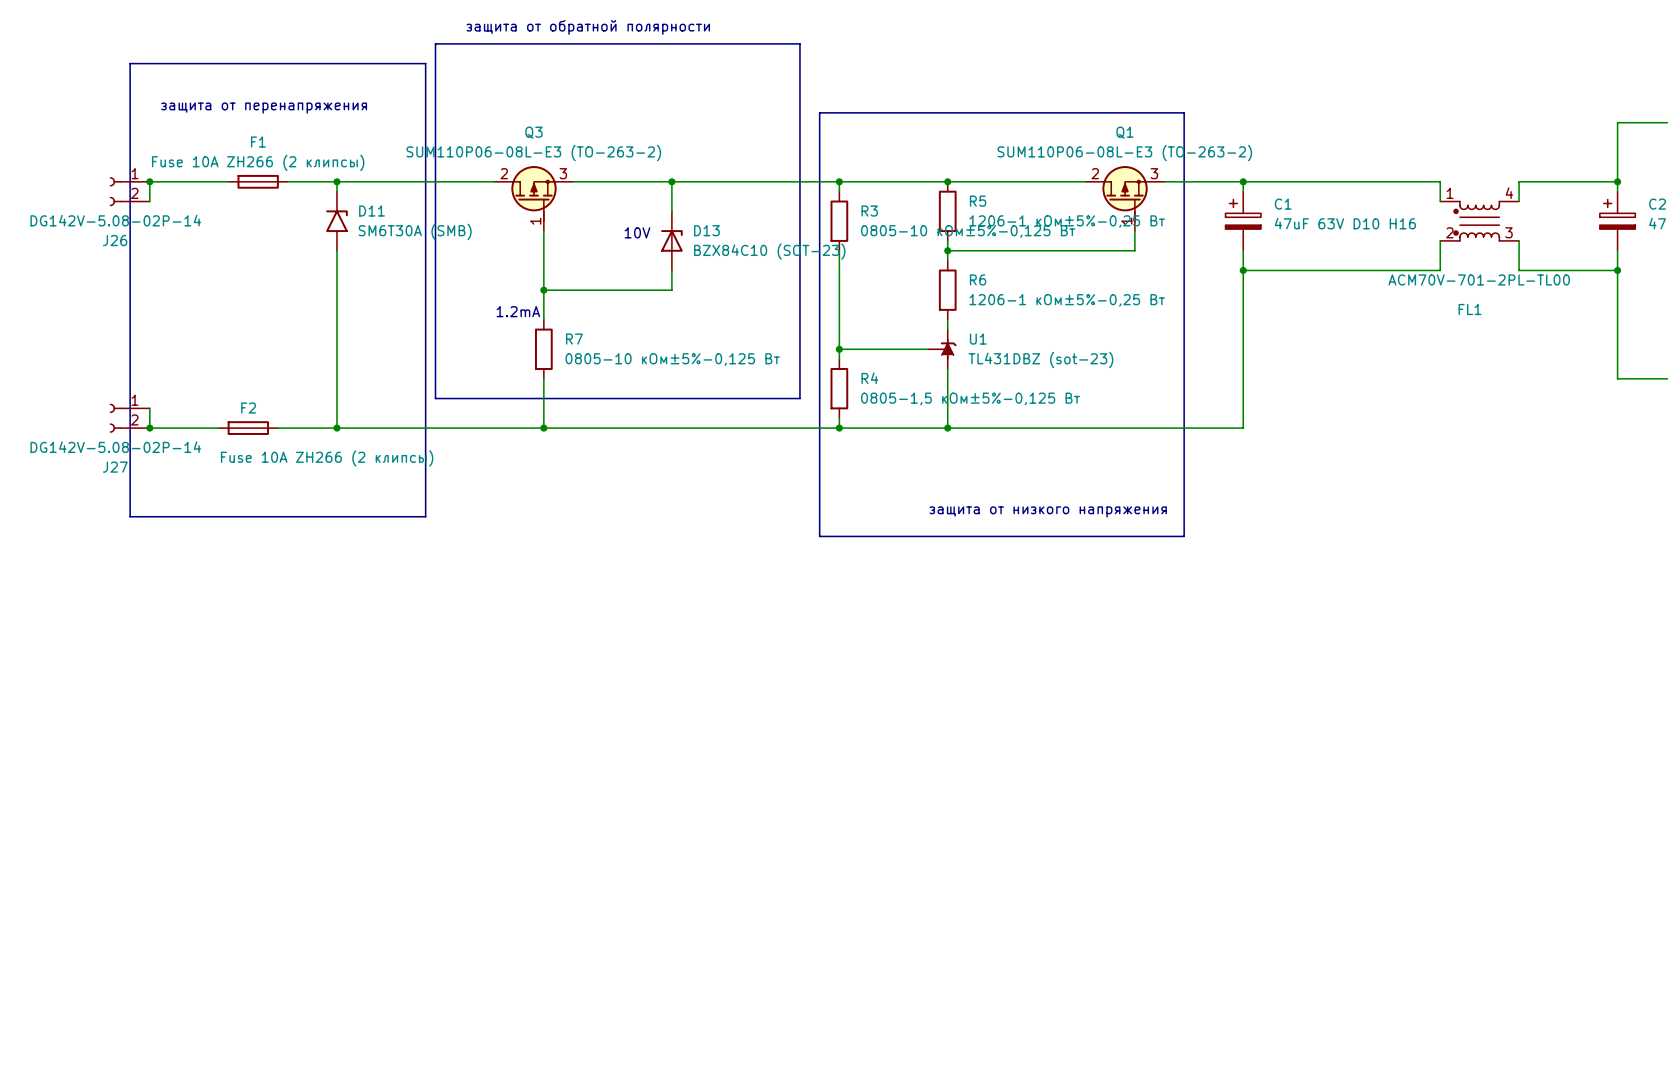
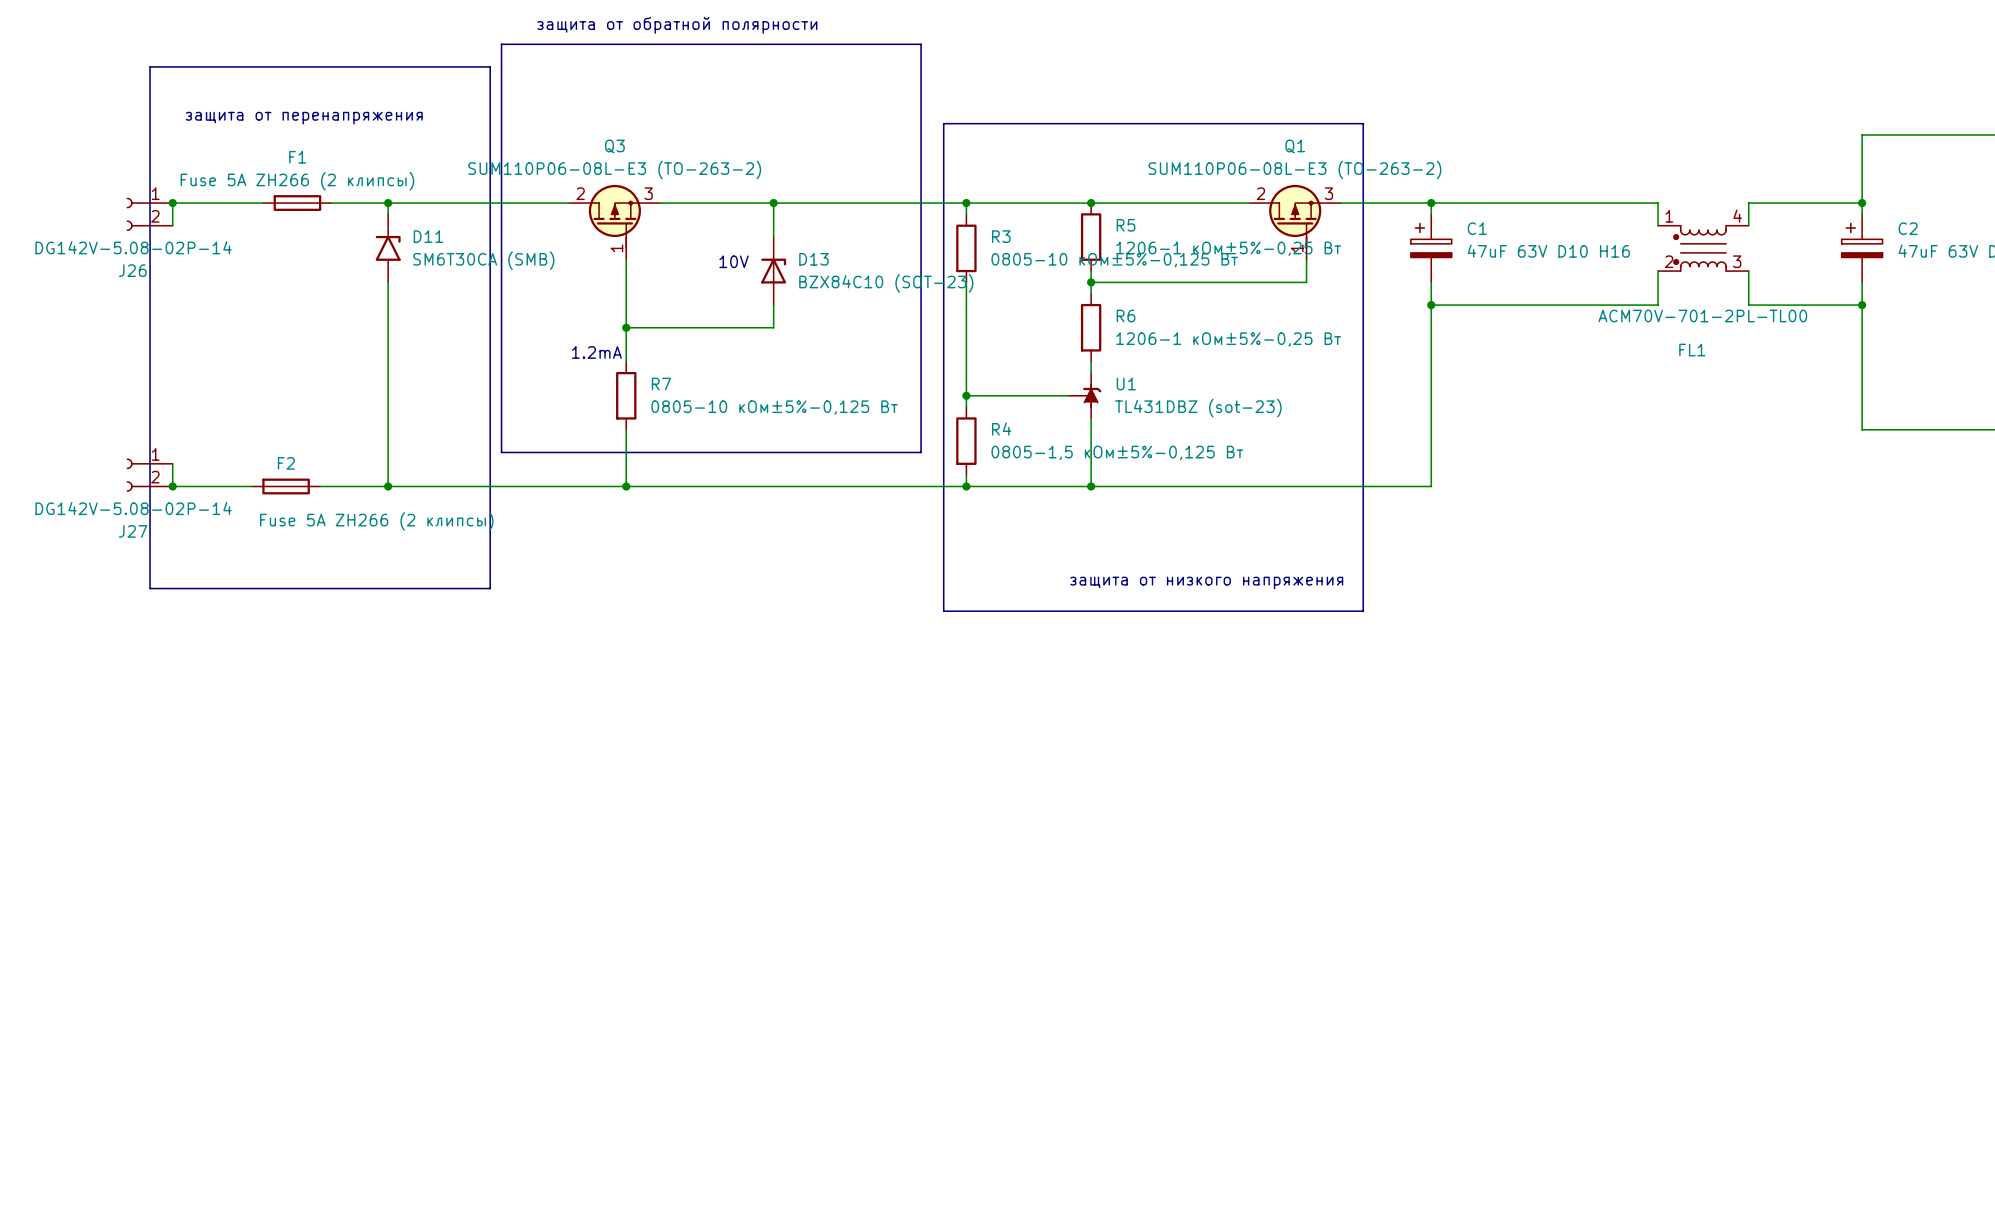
F1 value: Fuse 10A ZH266 (2 клипсы) (258, 162) -> Fuse 5A ZH266 (2 клипсы) (297, 181)
D11 value: SM6T30A (SMB) (415, 231) -> SM6T30CA (SMB) (483, 260)
F2 value: Fuse 10A ZH266 (2 клипсы) (327, 458) -> Fuse 5A ZH266 (2 клипсы) (376, 521)

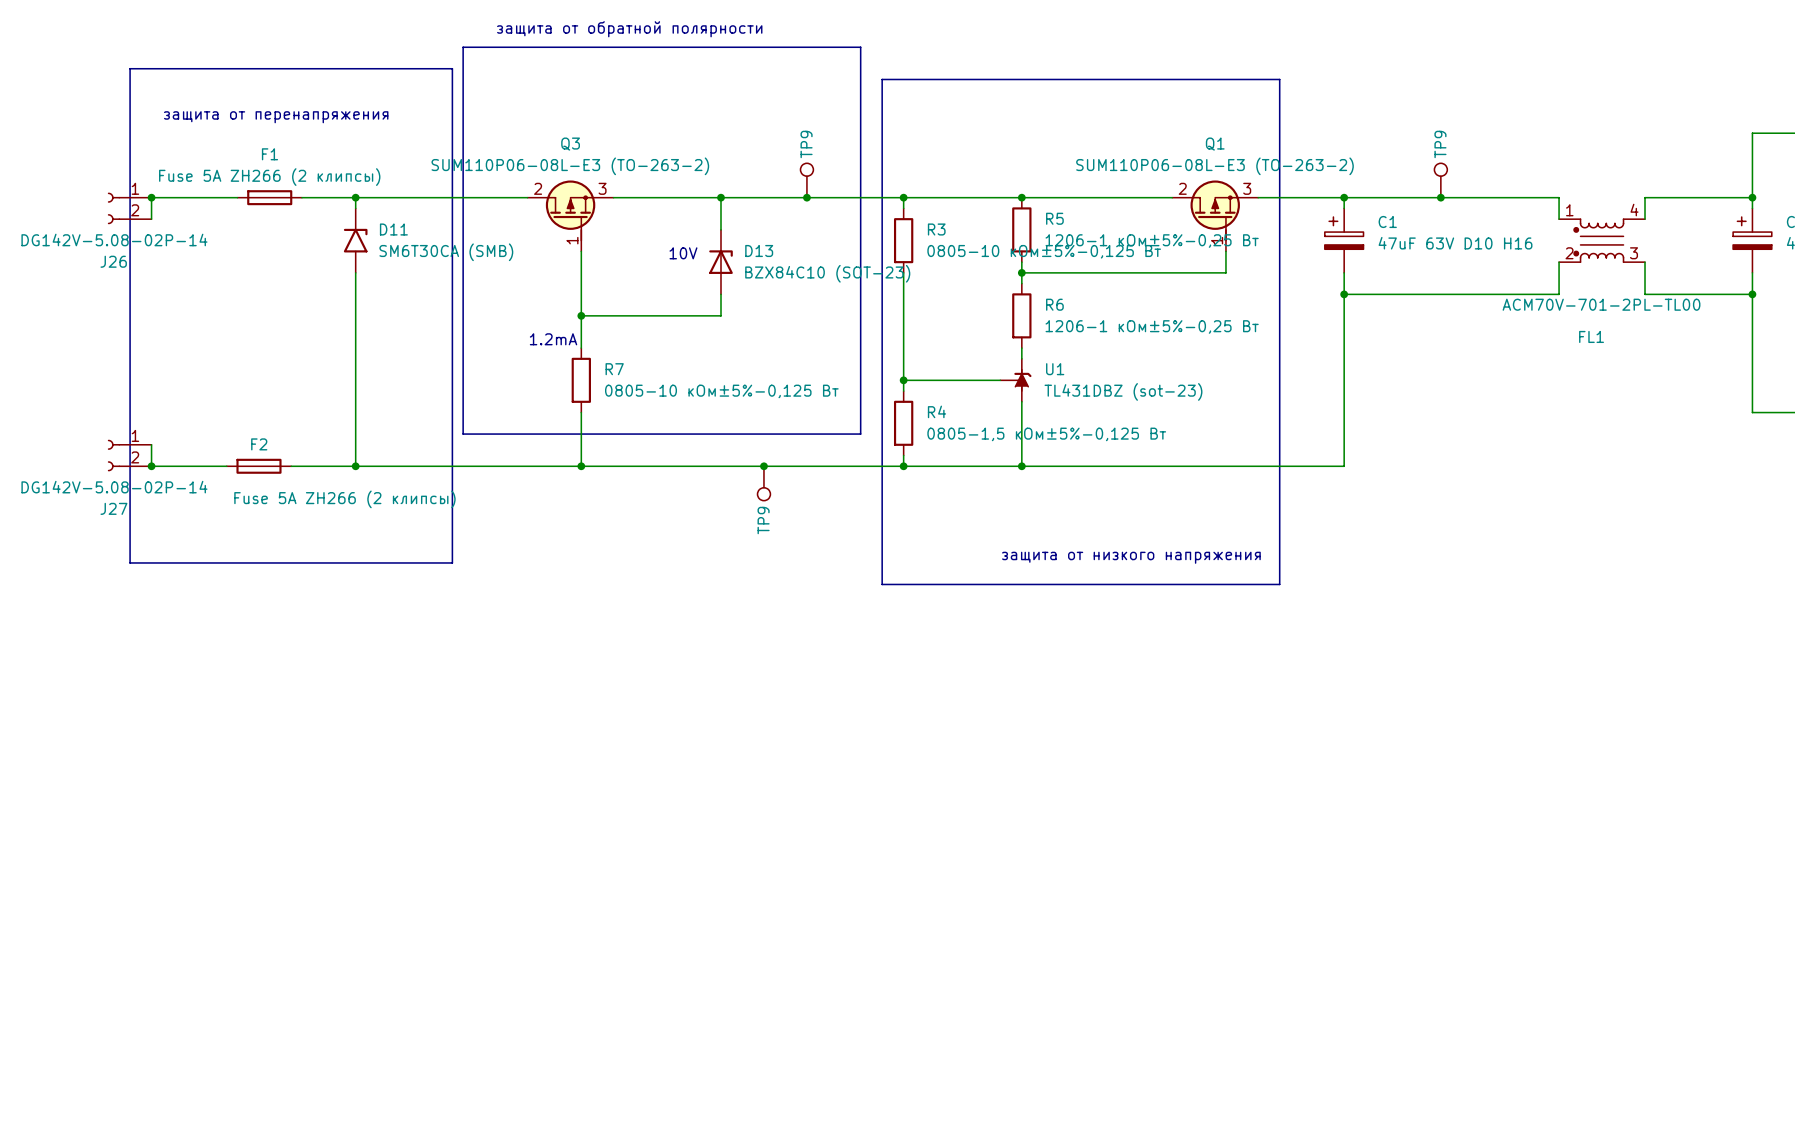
line: (943, 123) (1363, 123) -> (882, 122) (882, 79) (1279, 79) (1279, 122)
TP9: none -> (806, 180)
TP9: none -> (1440, 180)
junction: none -> (806, 197)
junction: none -> (1440, 197)
junction: none -> (763, 466)
TP9: none -> (763, 483)

